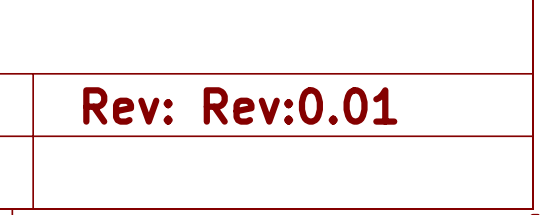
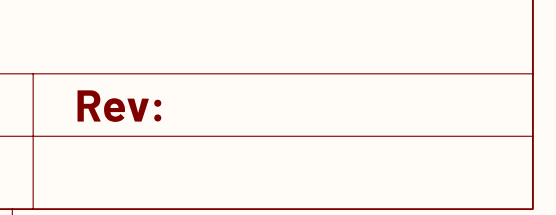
title block: Rev: Rev:0.01 (240, 105) -> Rev: (119, 106)

